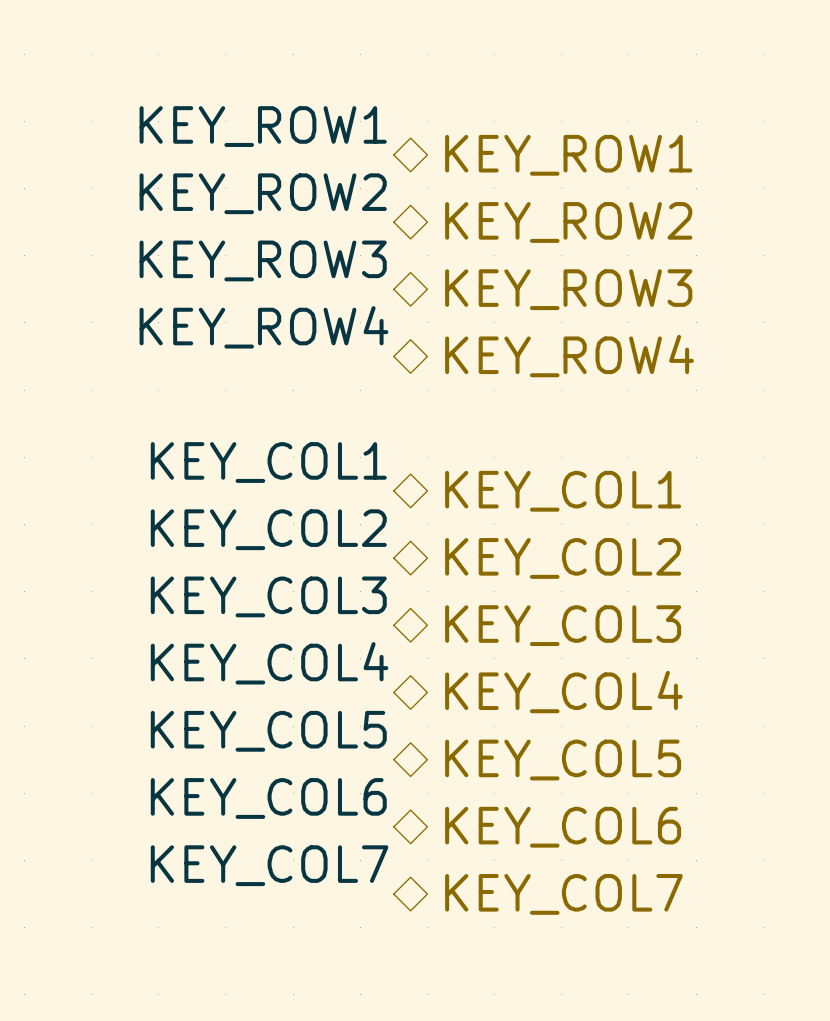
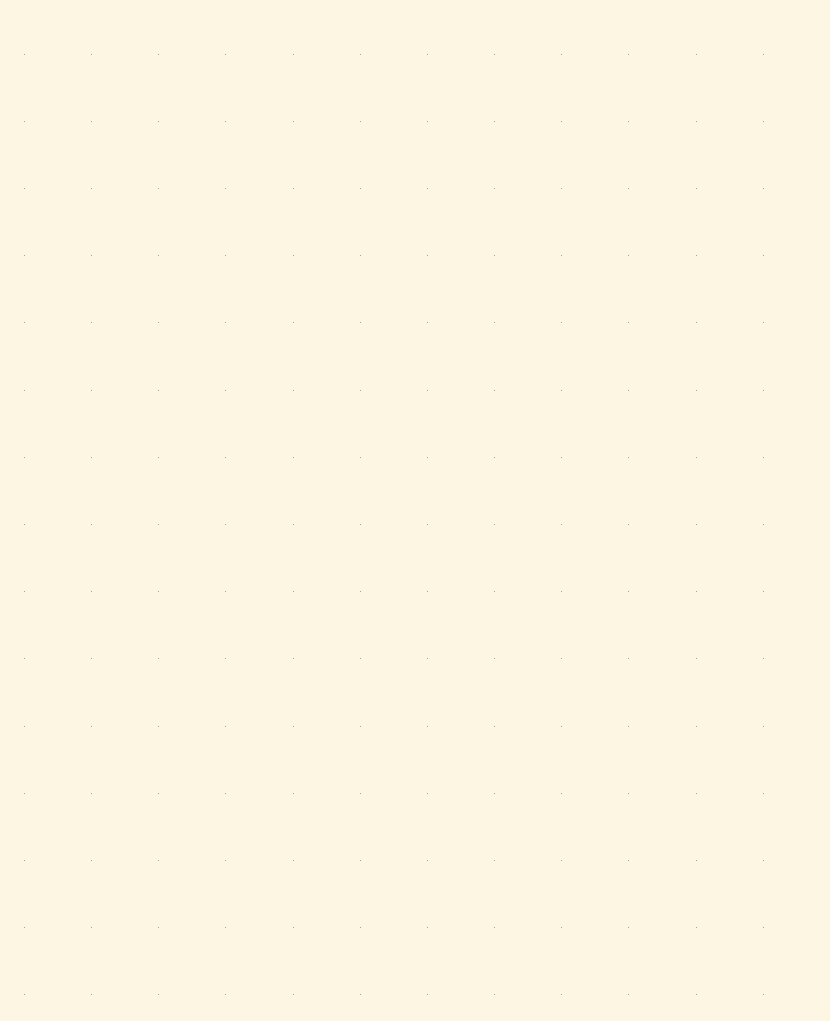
label: KEY_ROW1 (263, 126) -> none
hierarchical label: KEY_ROW1 (568, 155) -> none
label: KEY_ROW2 (263, 193) -> none
hierarchical label: KEY_ROW2 (568, 222) -> none
label: KEY_ROW3 (263, 260) -> none
hierarchical label: KEY_ROW3 (568, 289) -> none
label: KEY_ROW4 (263, 327) -> none
hierarchical label: KEY_ROW4 (569, 356) -> none
label: KEY_COL1 (268, 462) -> none
hierarchical label: KEY_COL1 (563, 491) -> none
label: KEY_COL2 (268, 529) -> none
hierarchical label: KEY_COL2 (563, 558) -> none
label: KEY_COL3 (268, 596) -> none
hierarchical label: KEY_COL3 (563, 625) -> none
label: KEY_COL4 (269, 663) -> none
hierarchical label: KEY_COL4 (563, 692) -> none
label: KEY_COL5 (268, 731) -> none
hierarchical label: KEY_COL5 (563, 760) -> none
label: KEY_COL6 (268, 798) -> none
hierarchical label: KEY_COL6 (563, 827) -> none
label: KEY_COL7 (269, 865) -> none
hierarchical label: KEY_COL7 (563, 894) -> none

